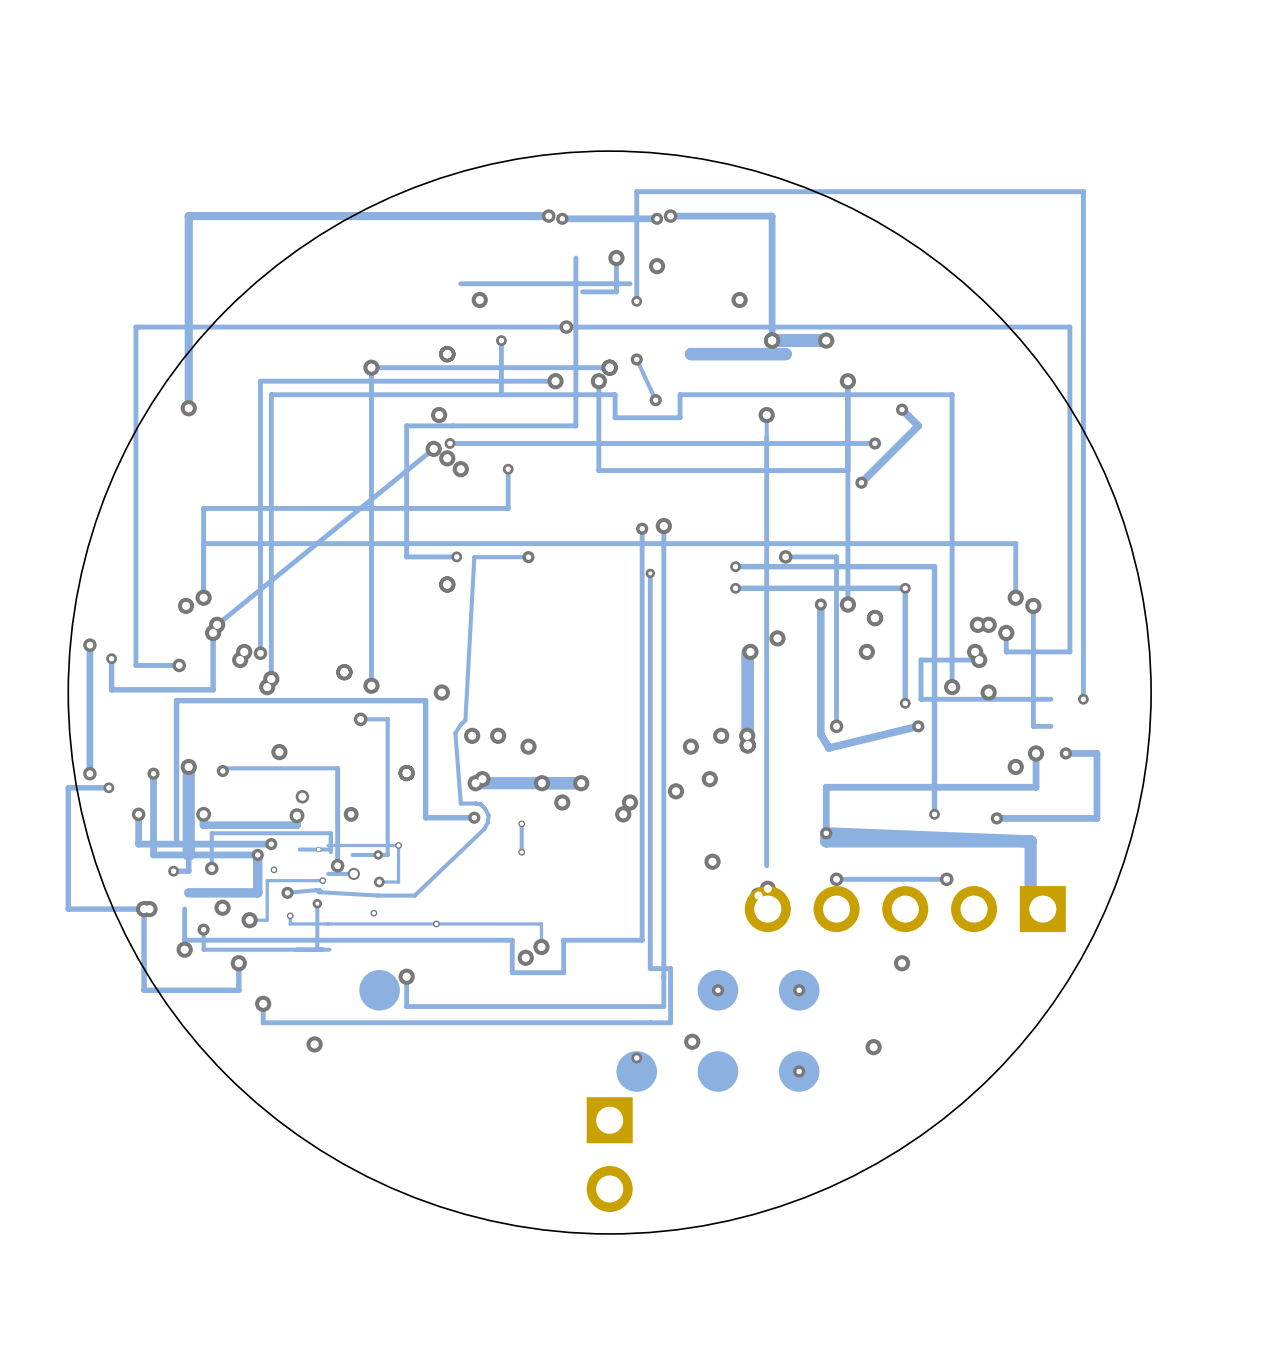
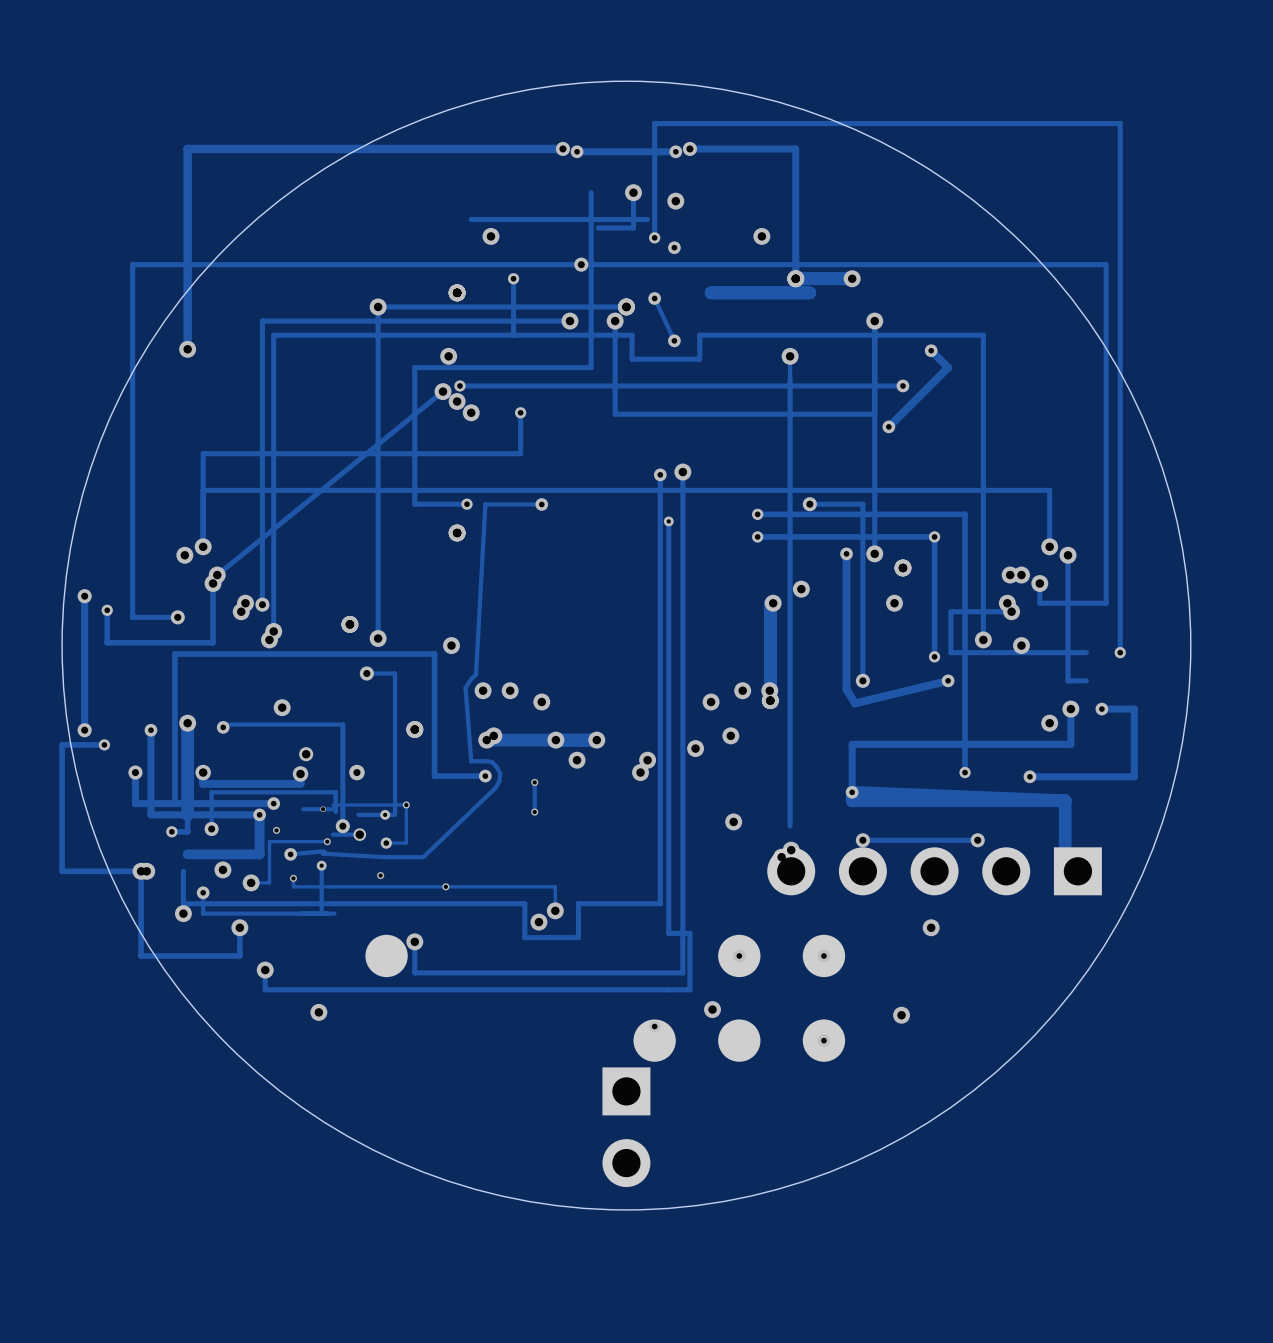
via: none -> (674, 247)

